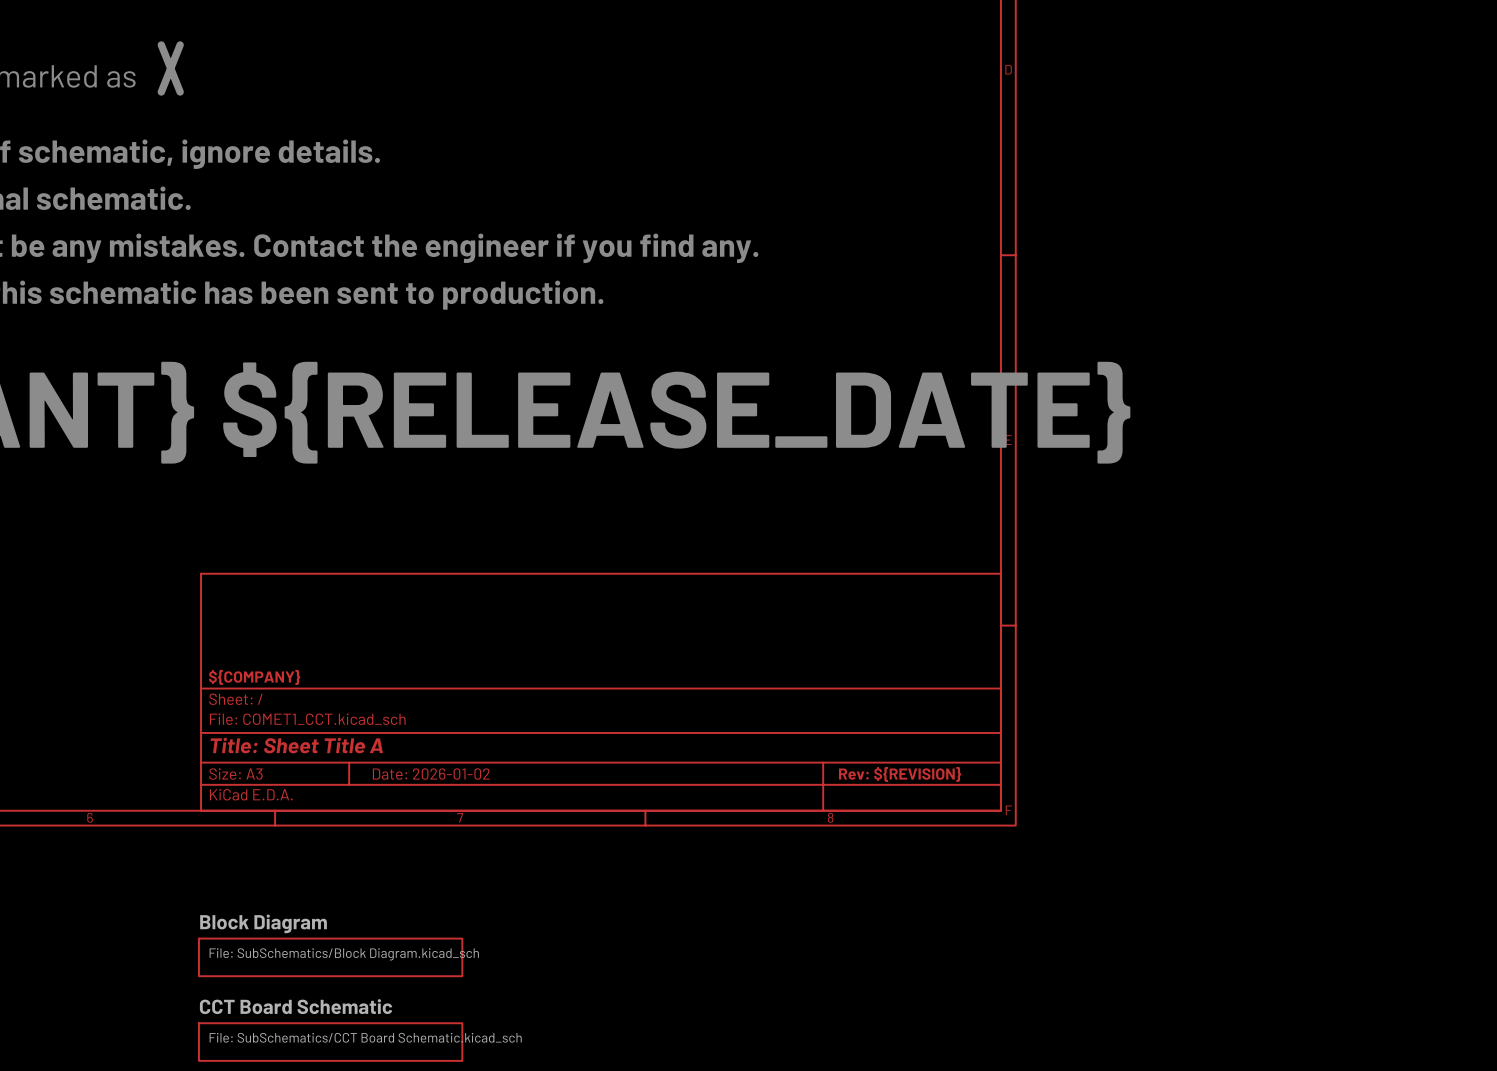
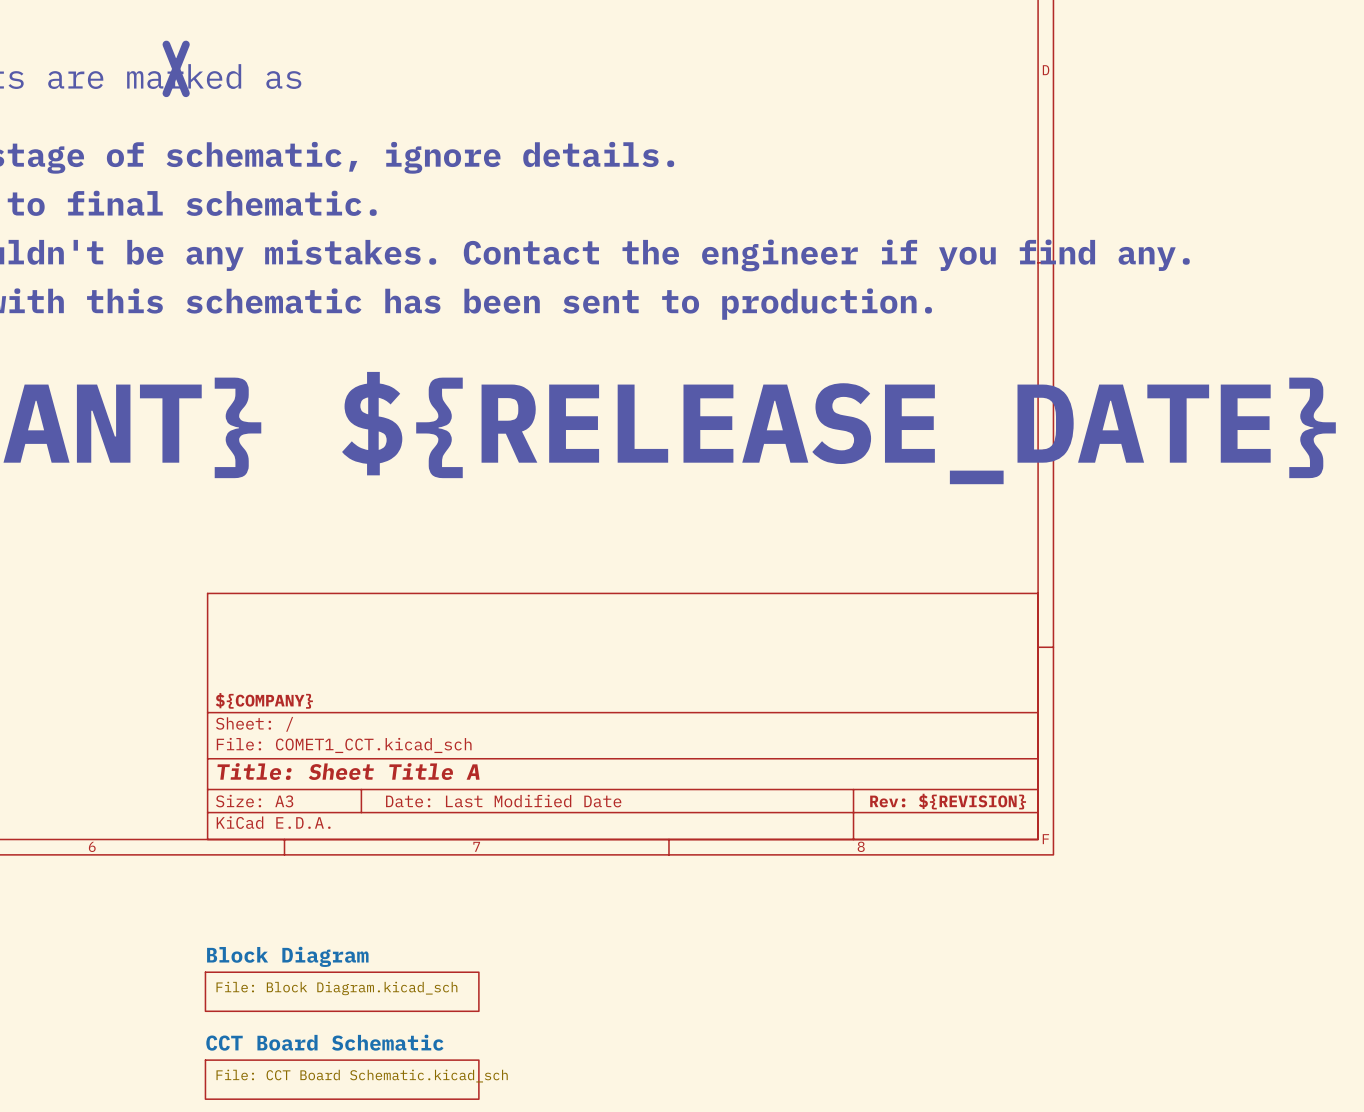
title block: Date: 2026-01-02 (431, 774) -> Date: Last Modified Date (503, 801)
sheet Block Diagram value: File: SubSchematics/Block Diagram.kicad_sch (344, 954) -> File: Block Diagram.kicad_sch (336, 988)
sheet CCT Board Schematic value: File: SubSchematics/CCT Board Schematic.kicad_sch (365, 1037) -> File: CCT Board Schematic.kicad_sch (362, 1076)

